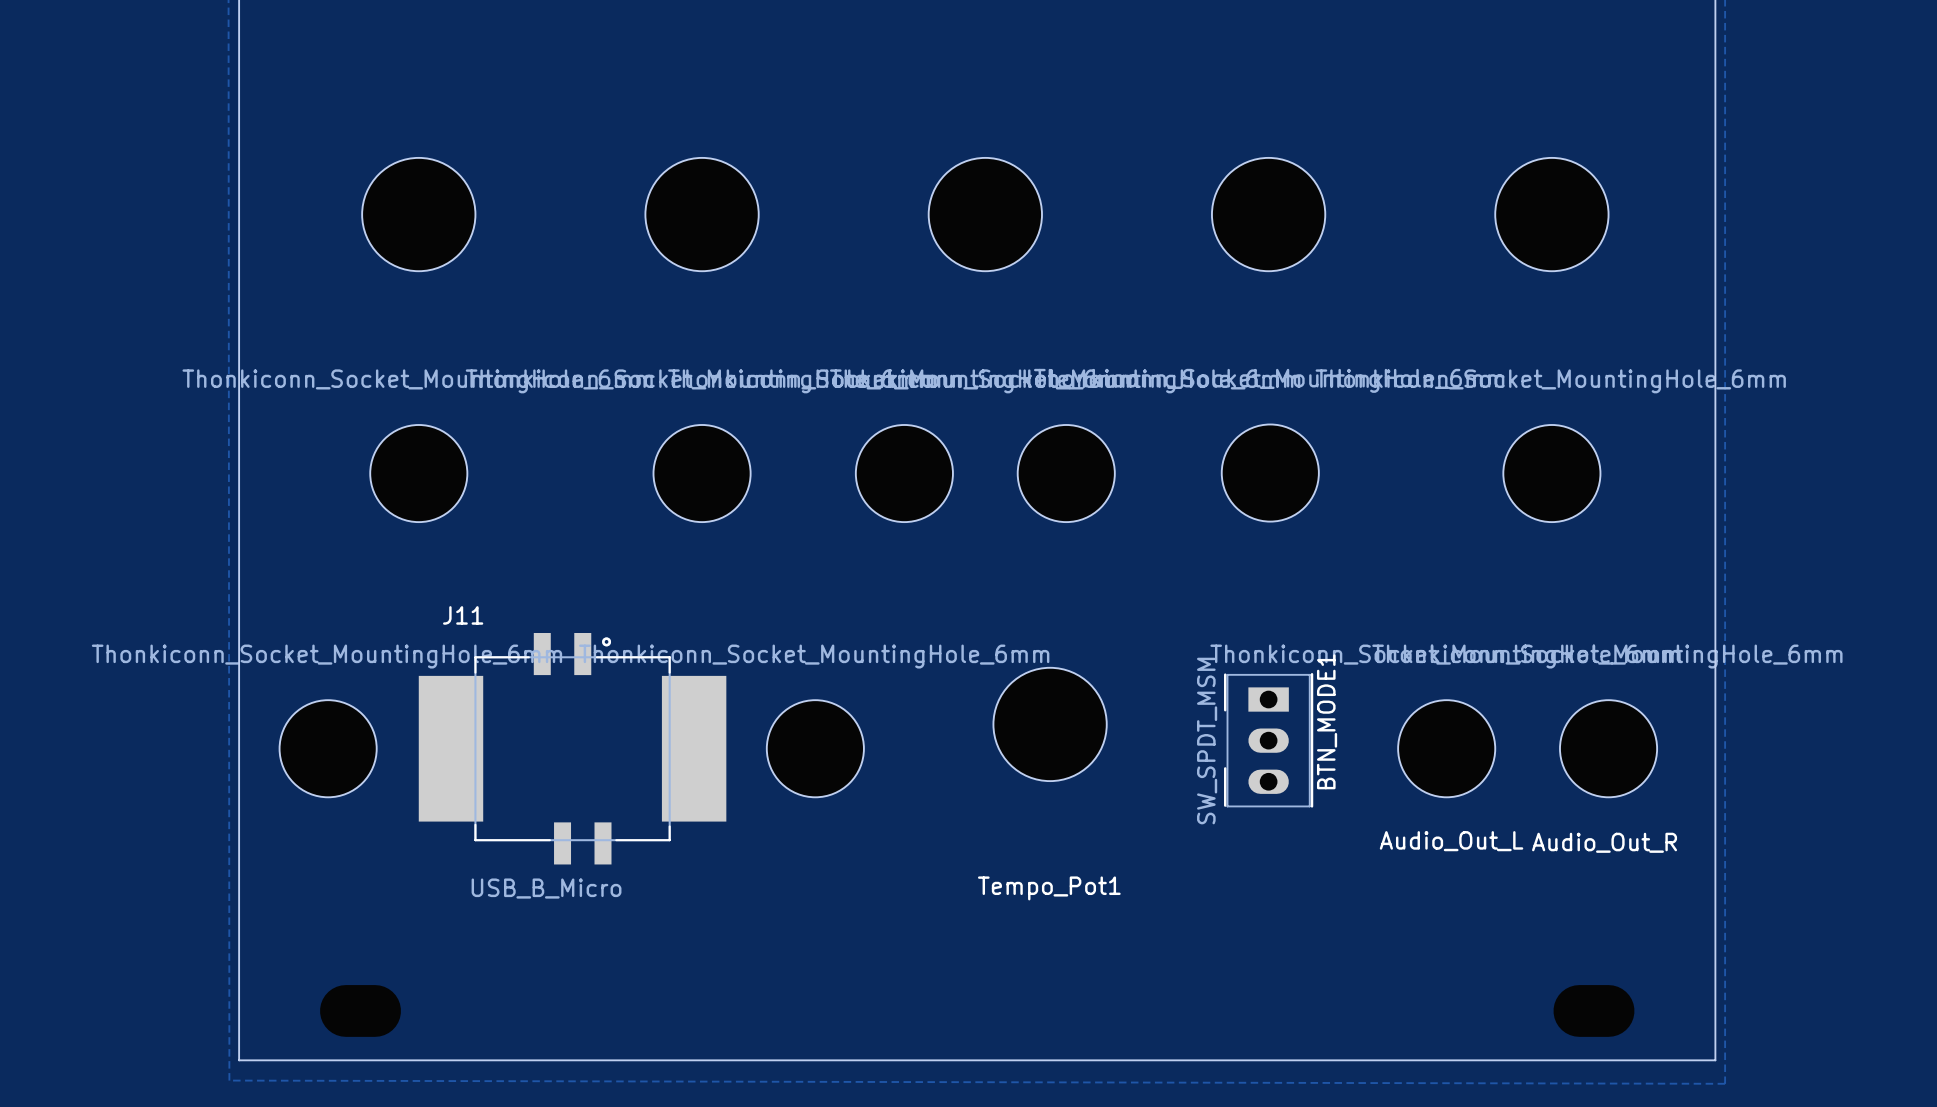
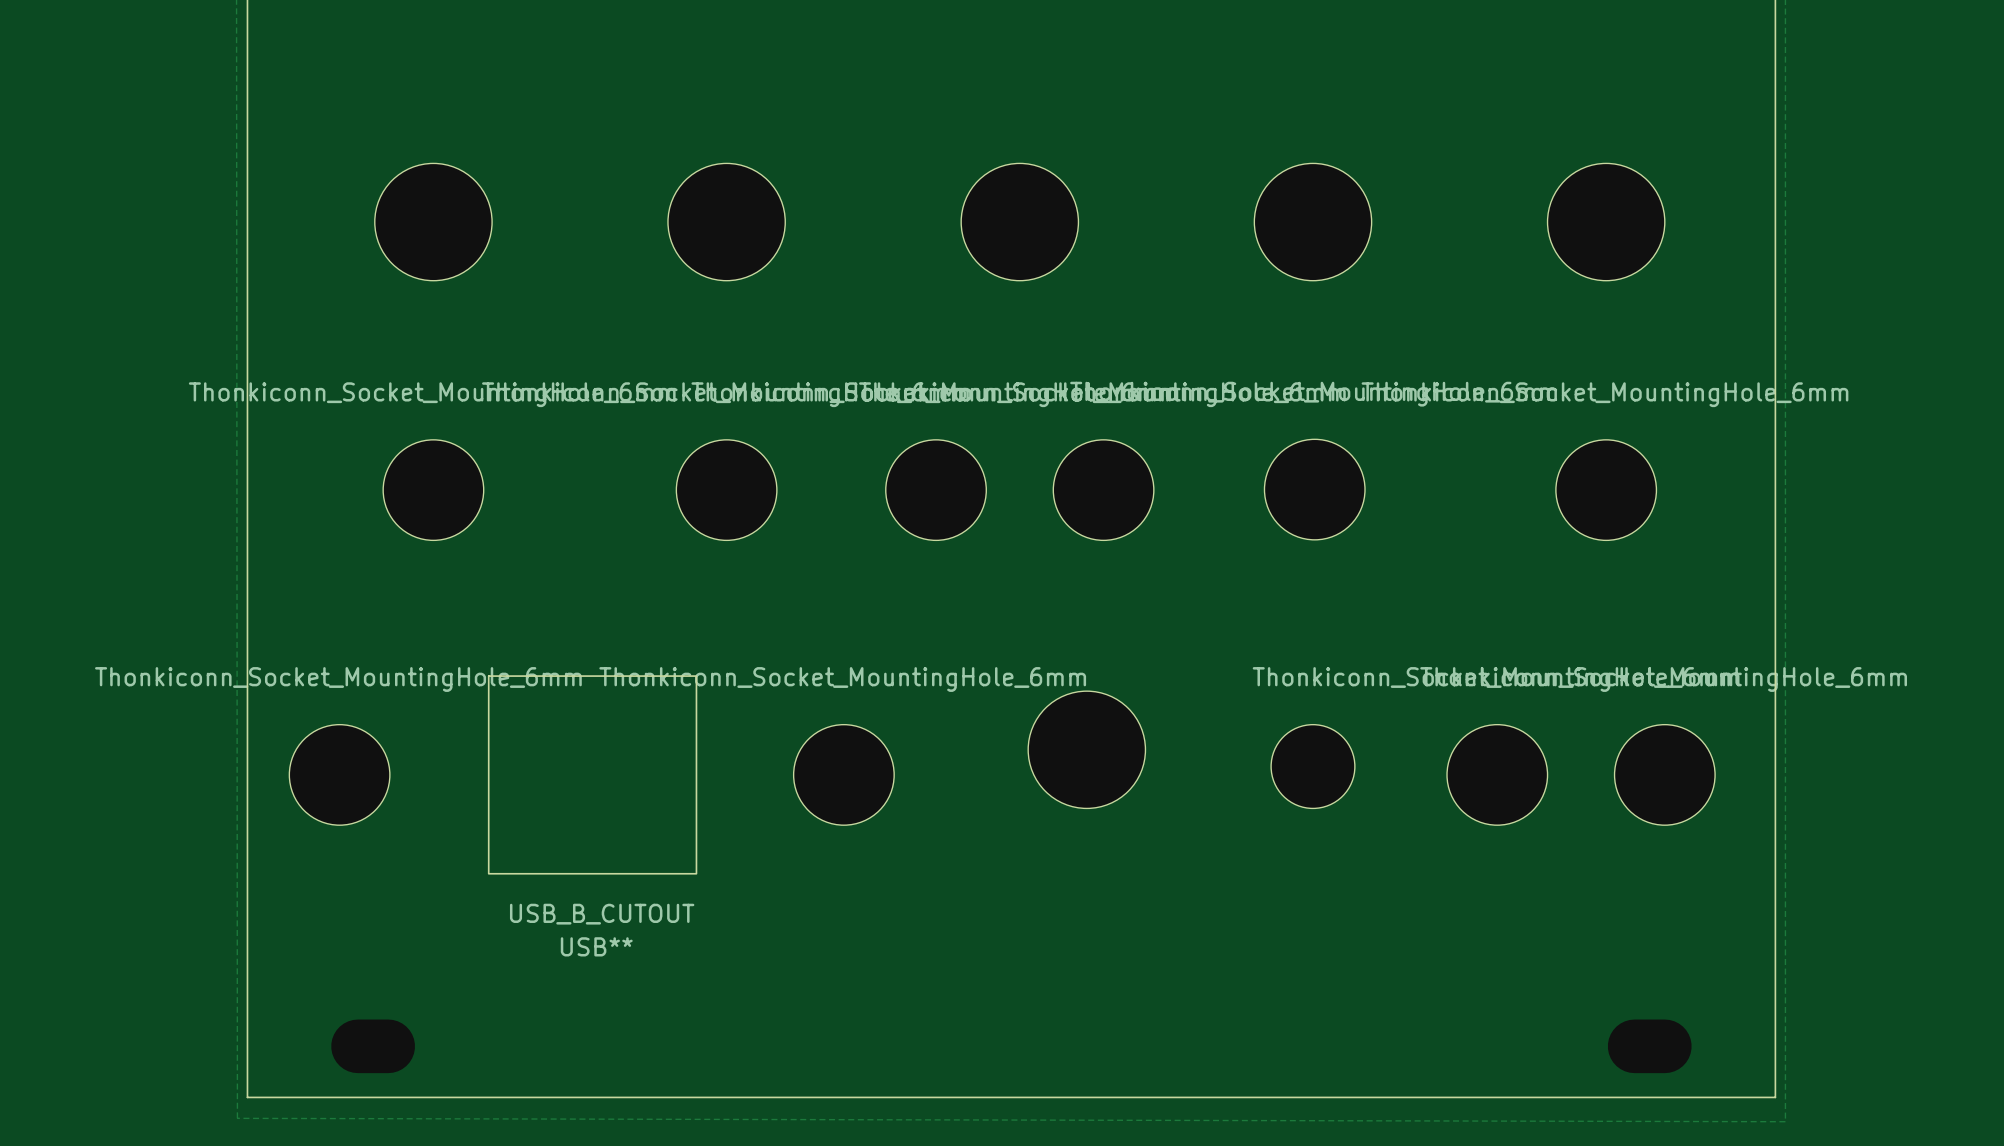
BTN_MODE1: SW_SPDT_MSM (1268, 740) -> none
part: none -> (1312, 766)
J11: USB_B_Micro (572, 748) -> none
USB**: none -> USB_B_CUTOUT (592, 774)
text: Audio_Out_L (1451, 841) -> none
text: Audio_Out_R (1604, 842) -> none
text: Tempo_Pot1 (1049, 888) -> none

